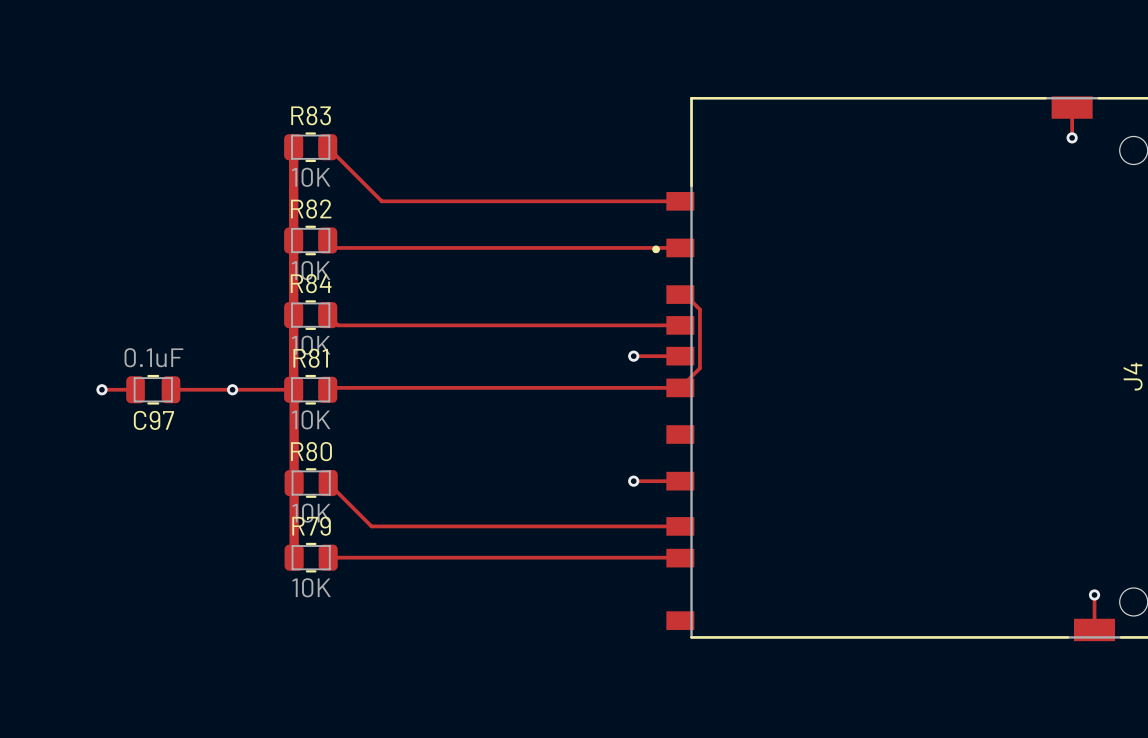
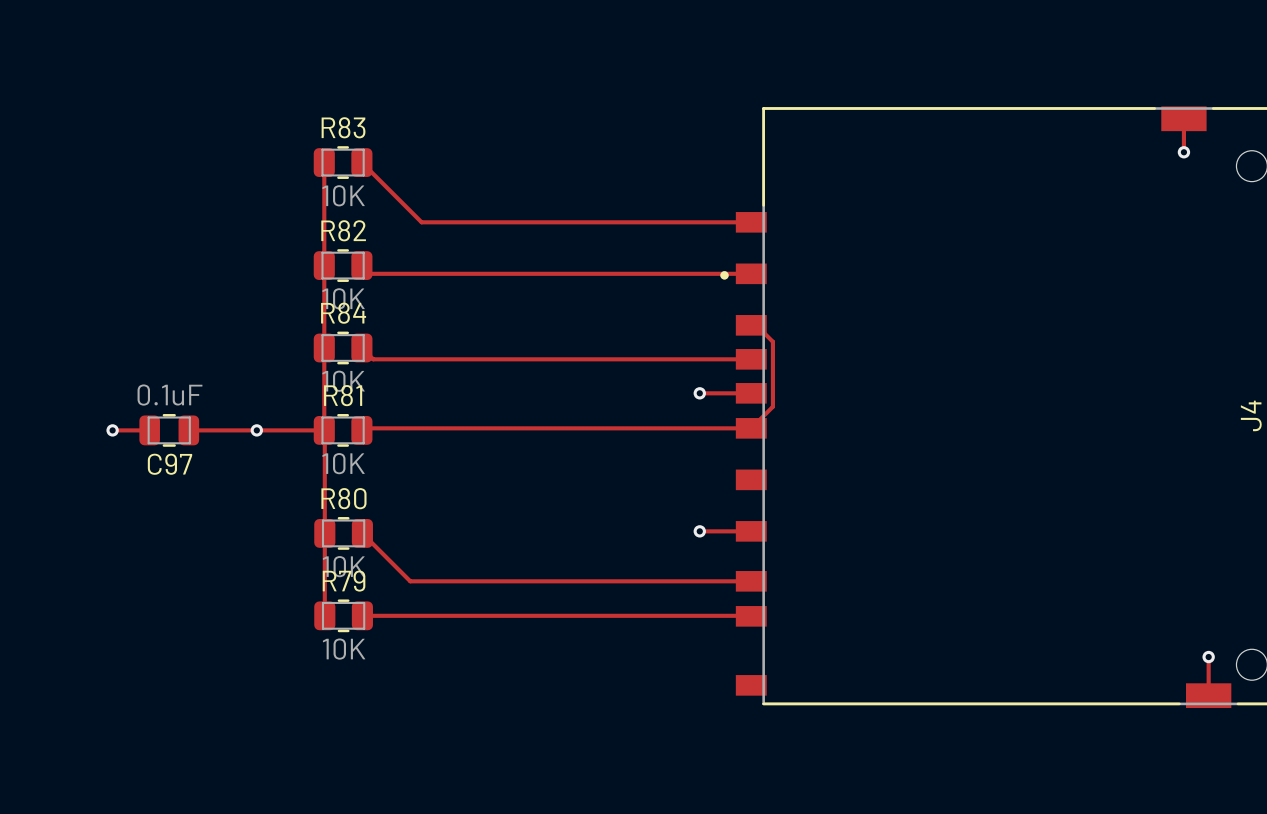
top track width: thick (293, 147) (293, 389) -> thin (324, 162) (324, 430)
top track width: thick (294, 390) (294, 557) -> thin (324, 430) (324, 615)

